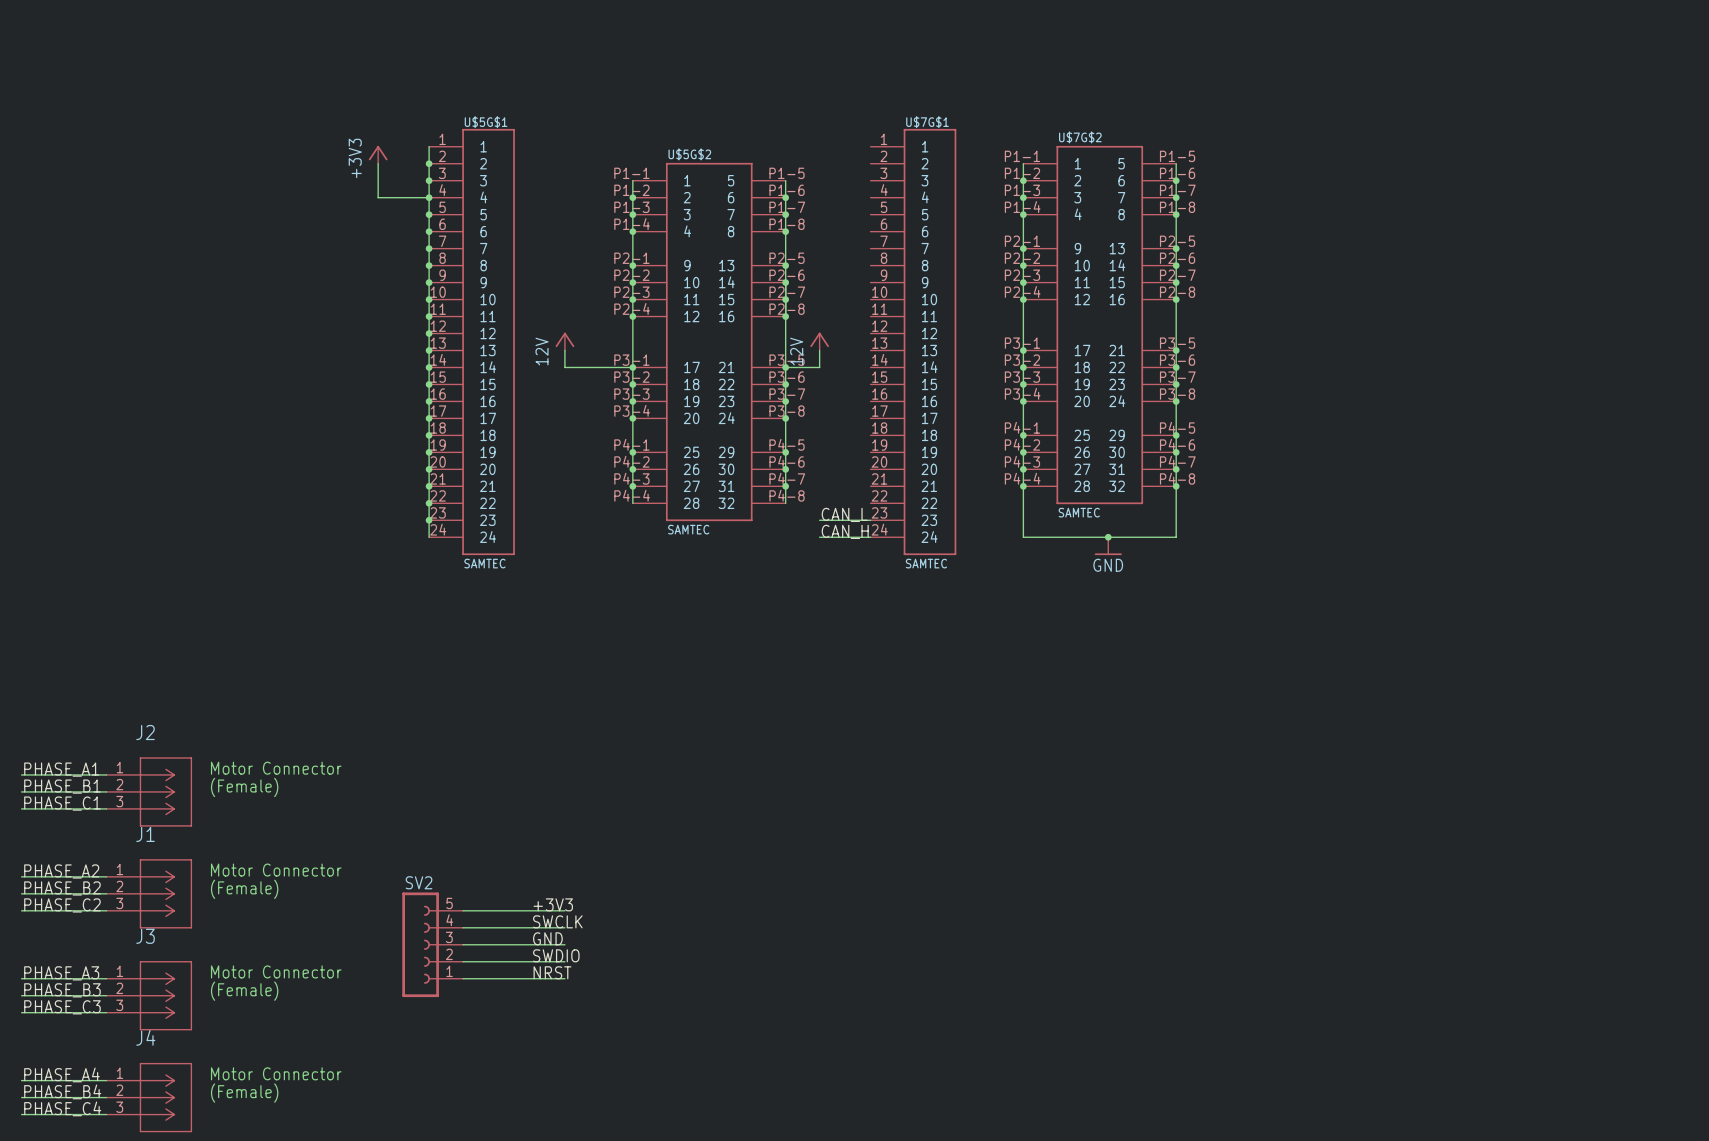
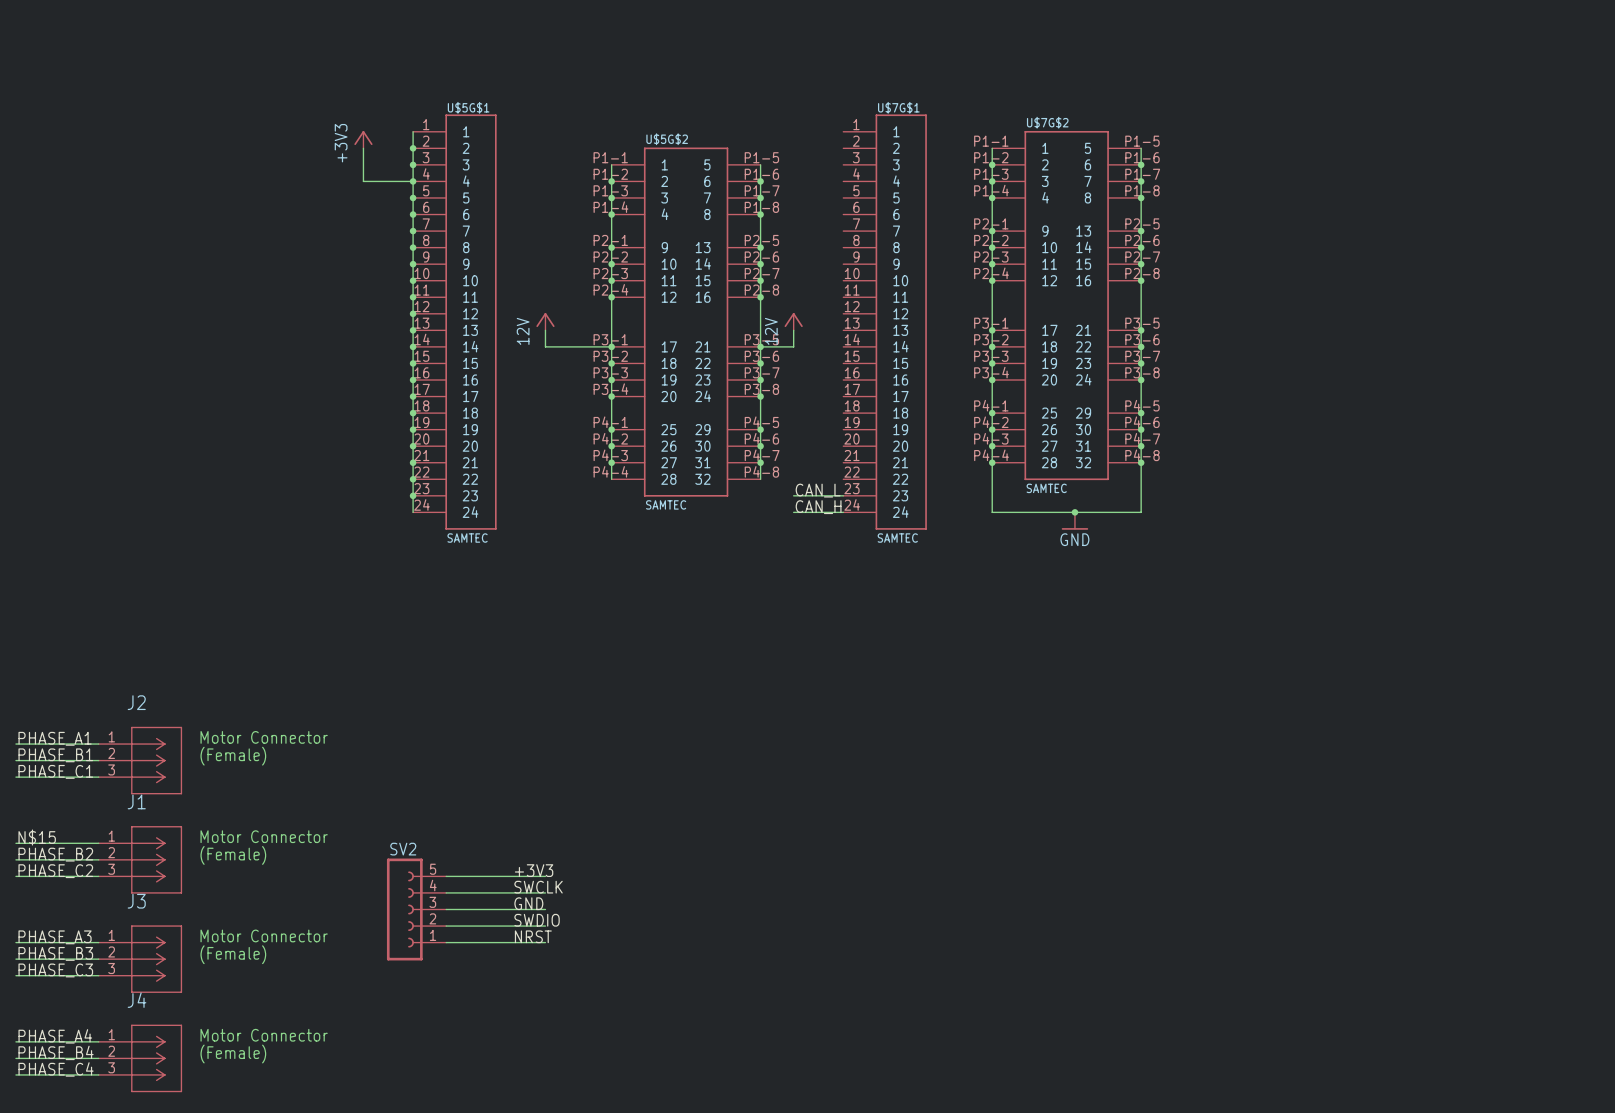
label: PHASE_A2 (61, 871) -> N$15 (37, 837)

